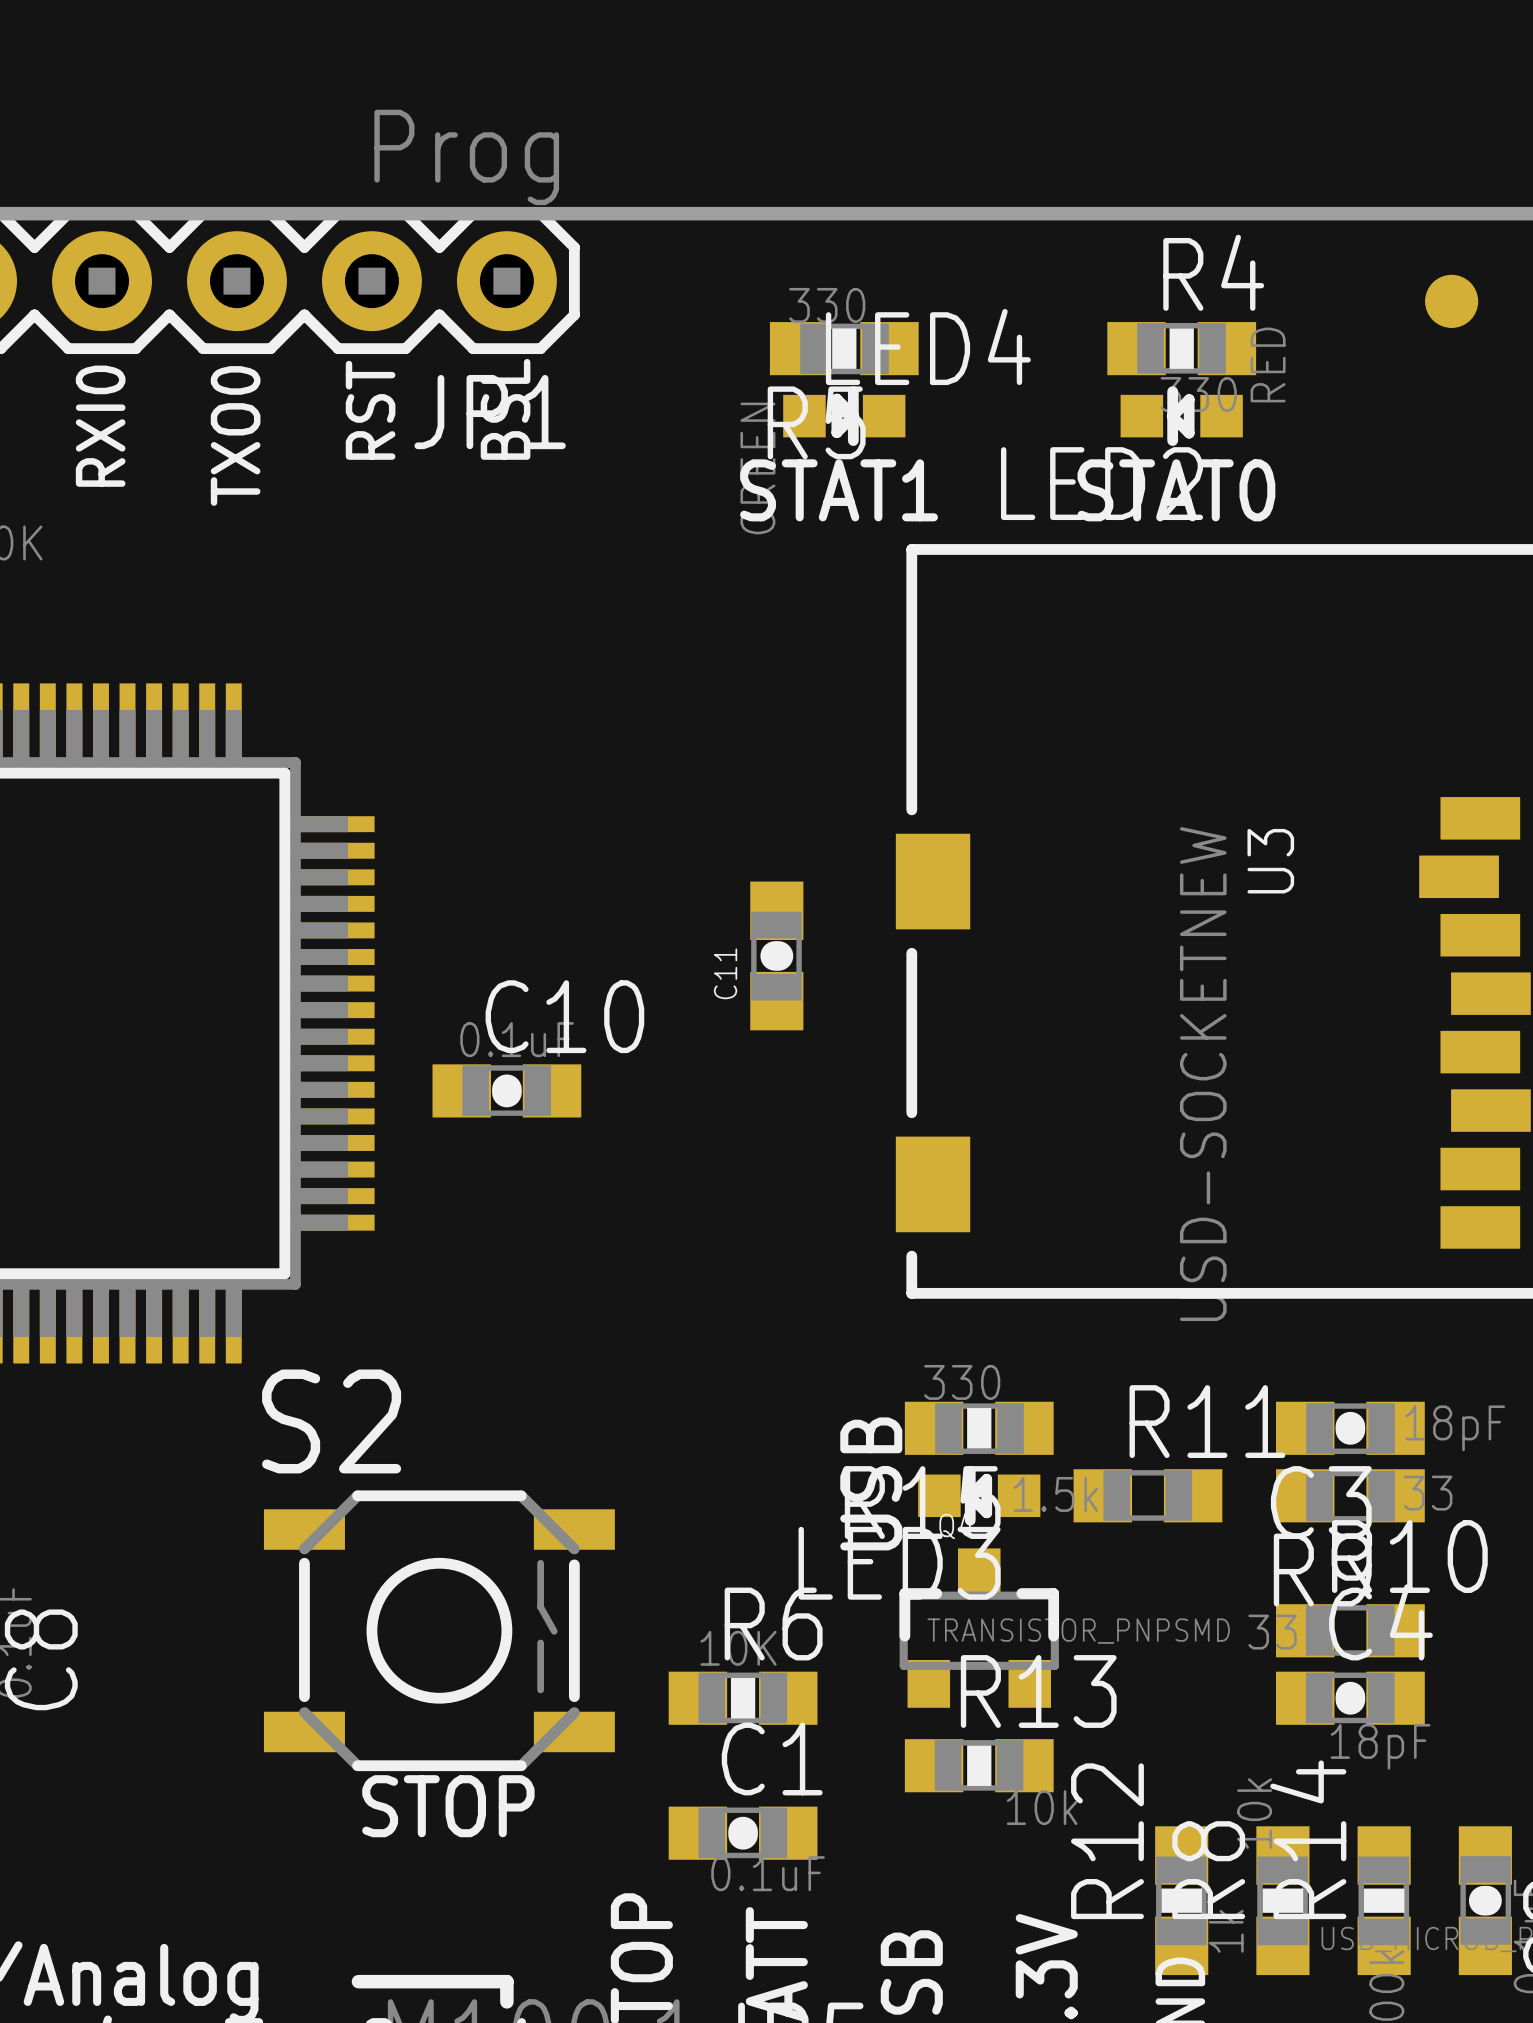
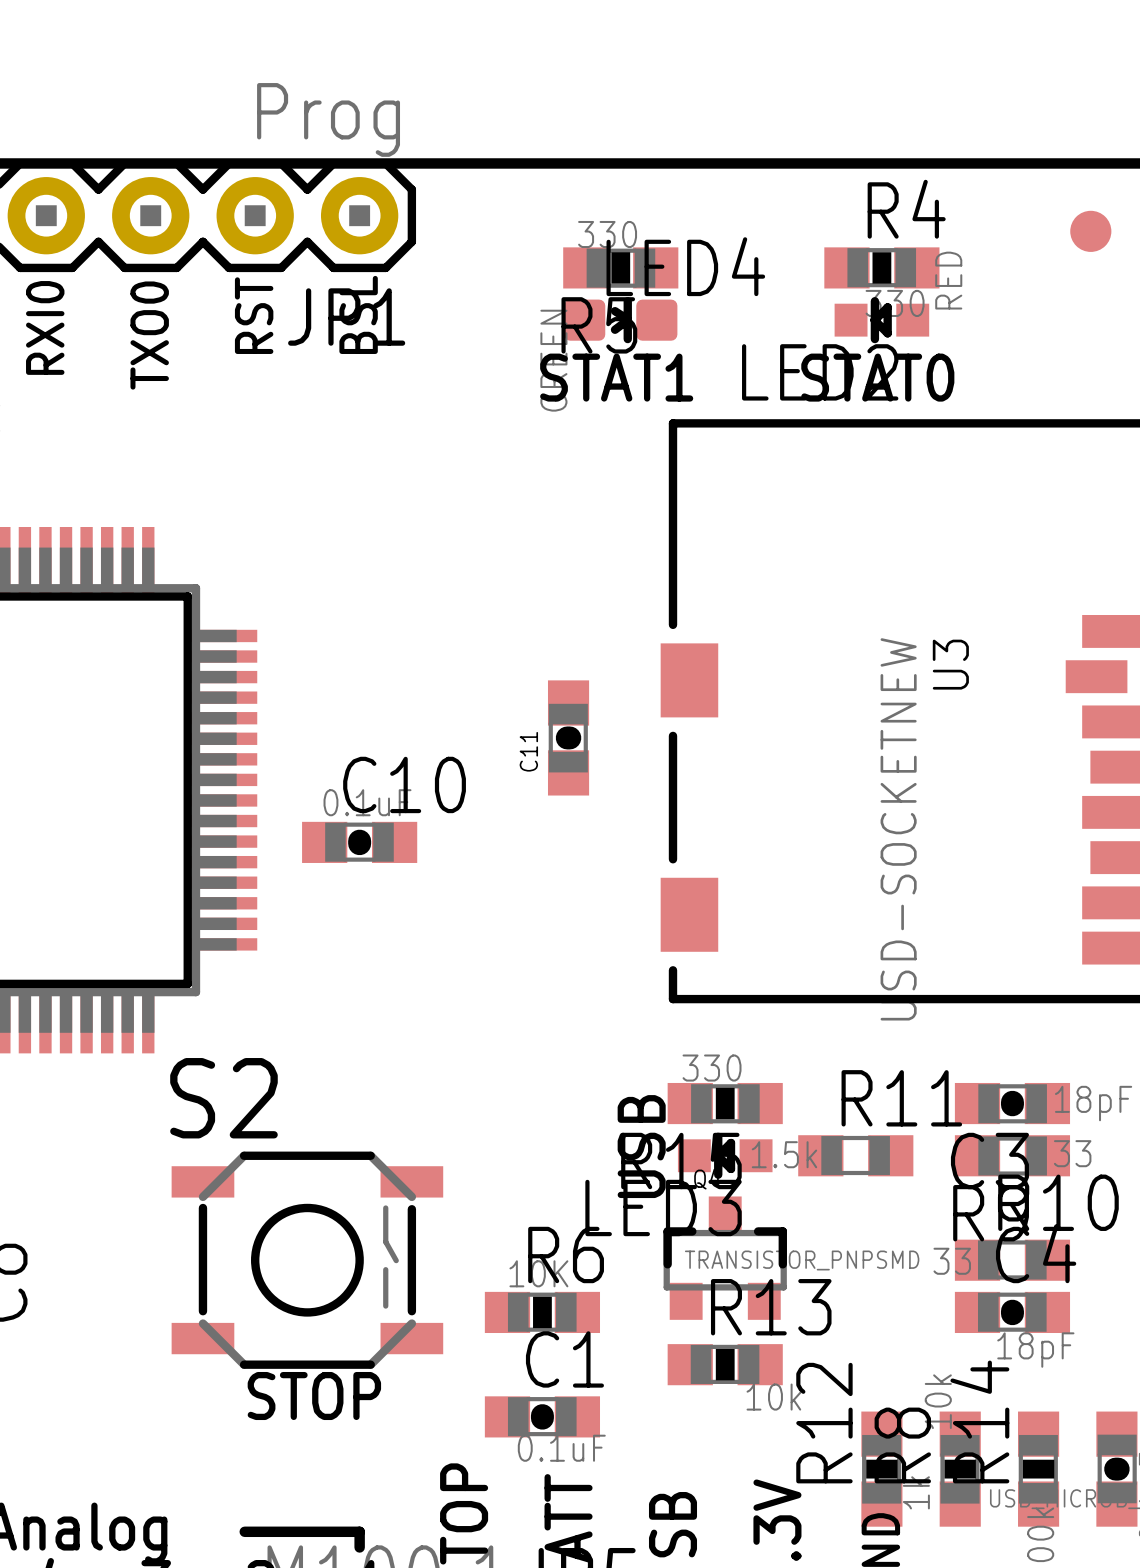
LED4 footprint: [783, 386, 906, 446] -> [564, 297, 678, 344]

